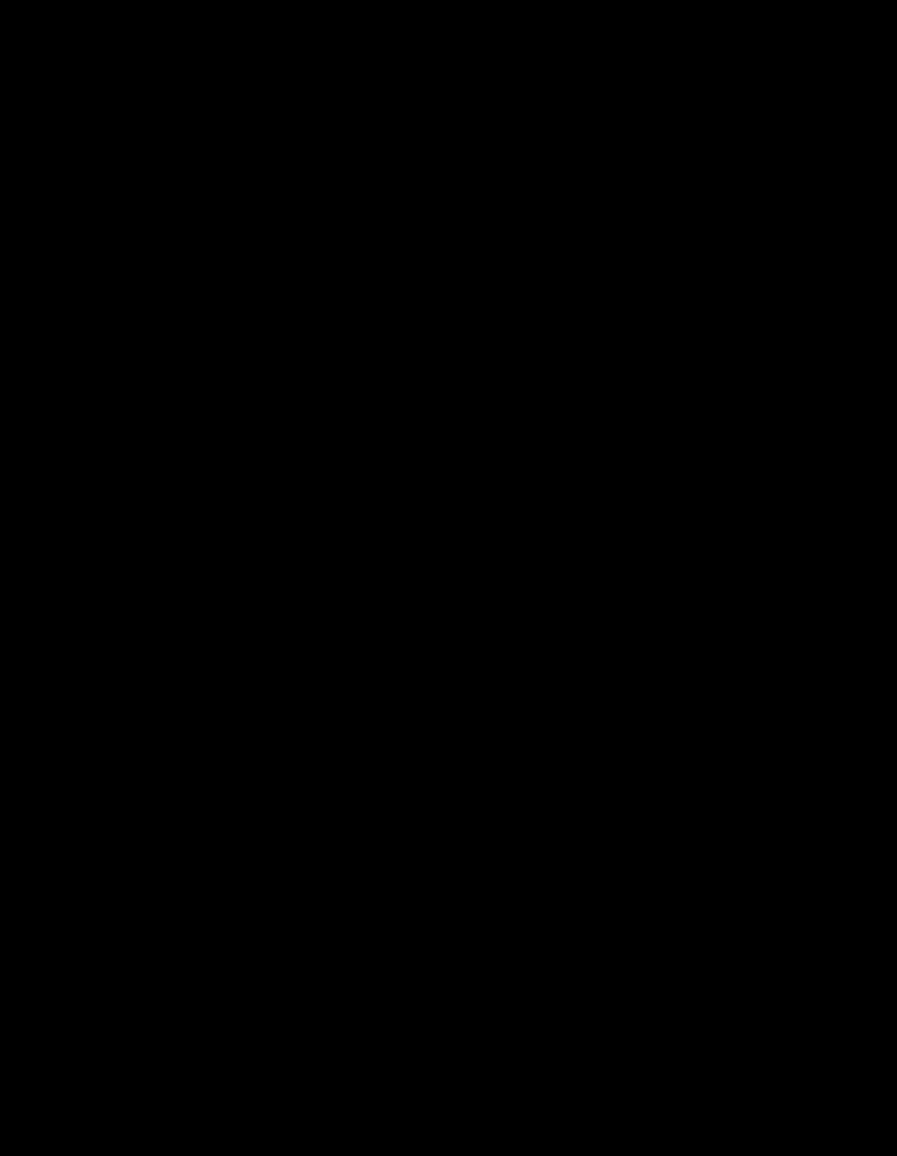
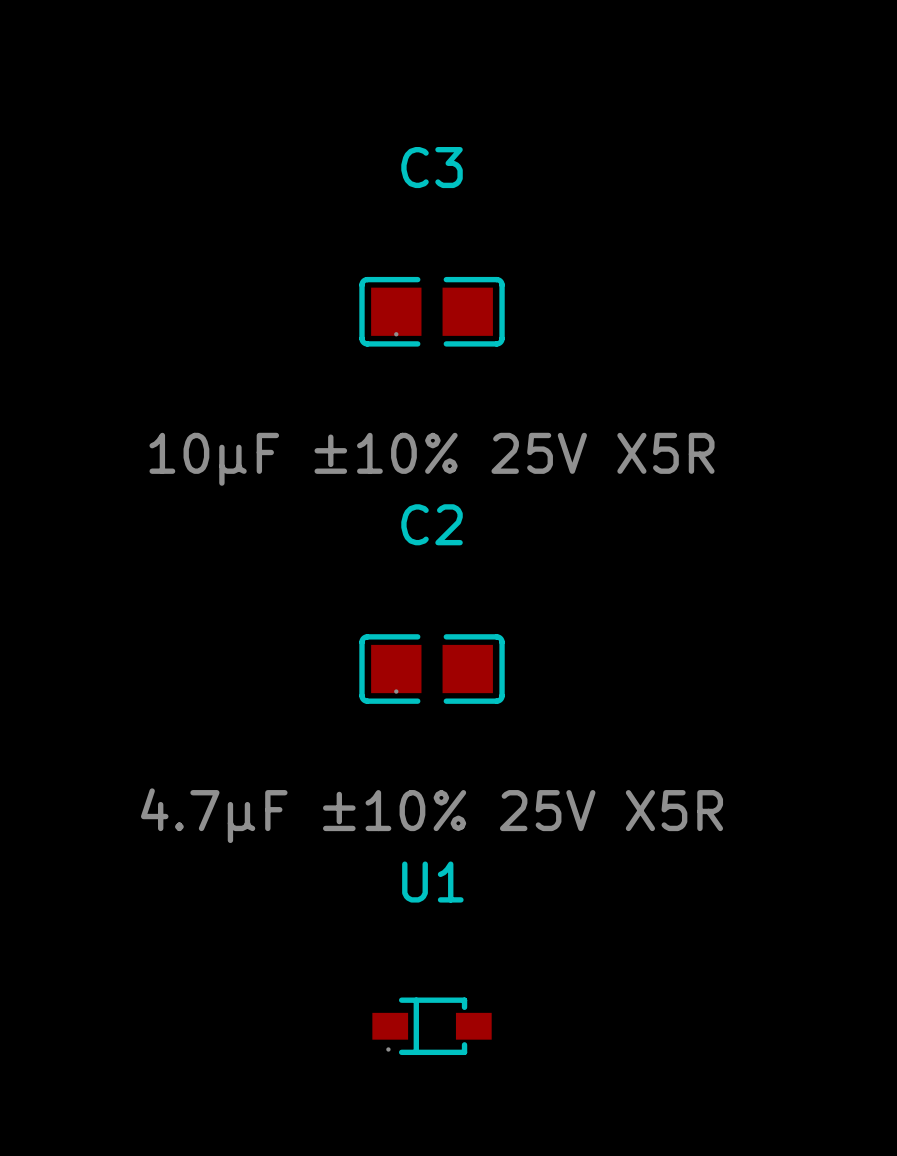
C3: none -> 10µF ±10% 25V X5R (432, 311)
C2: none -> 4.7µF ±10% 25V X5R (432, 669)
U1: none -> (432, 1026)

